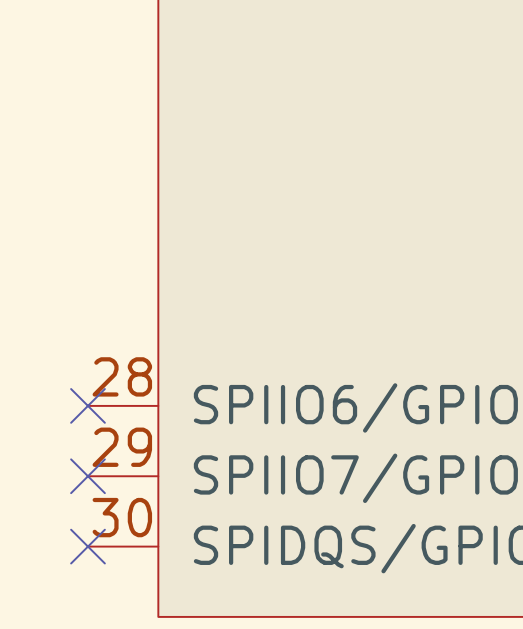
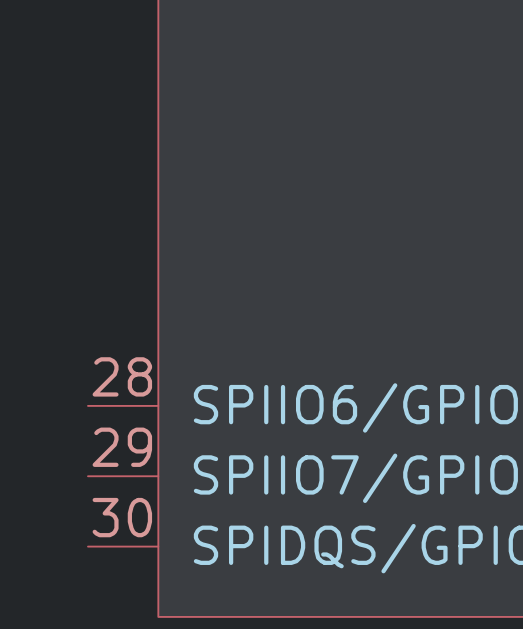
no-connect mark: (87, 405) -> none
no-connect mark: (87, 476) -> none
no-connect mark: (87, 546) -> none

